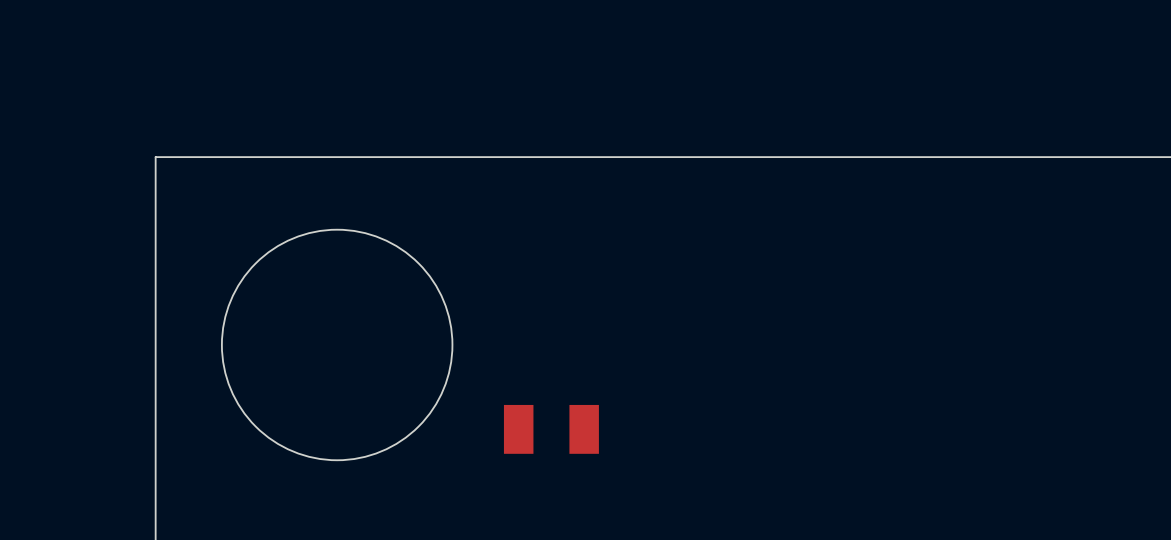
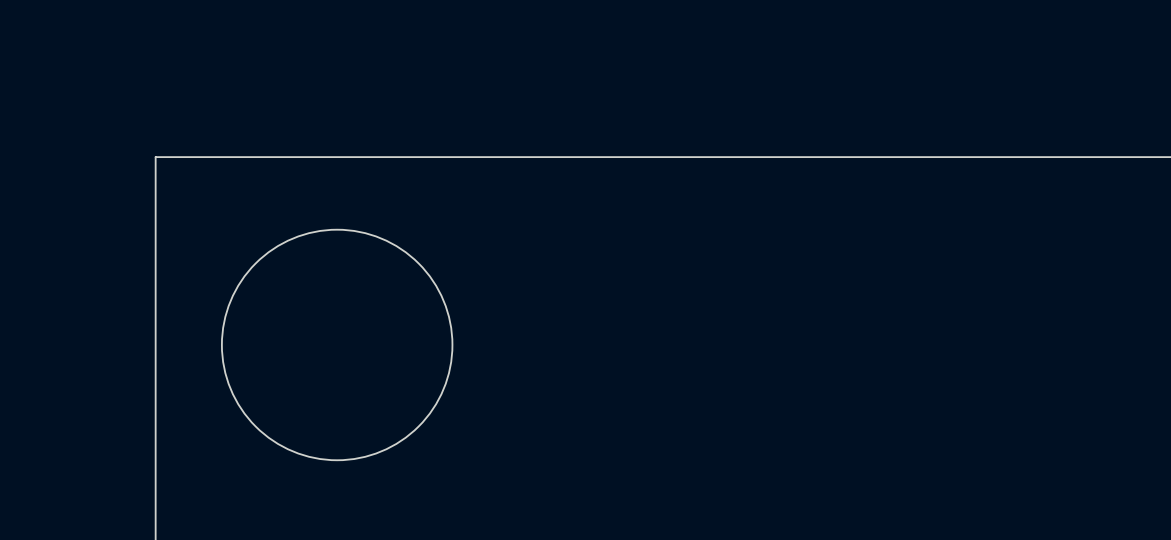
part: (551, 429) -> none

